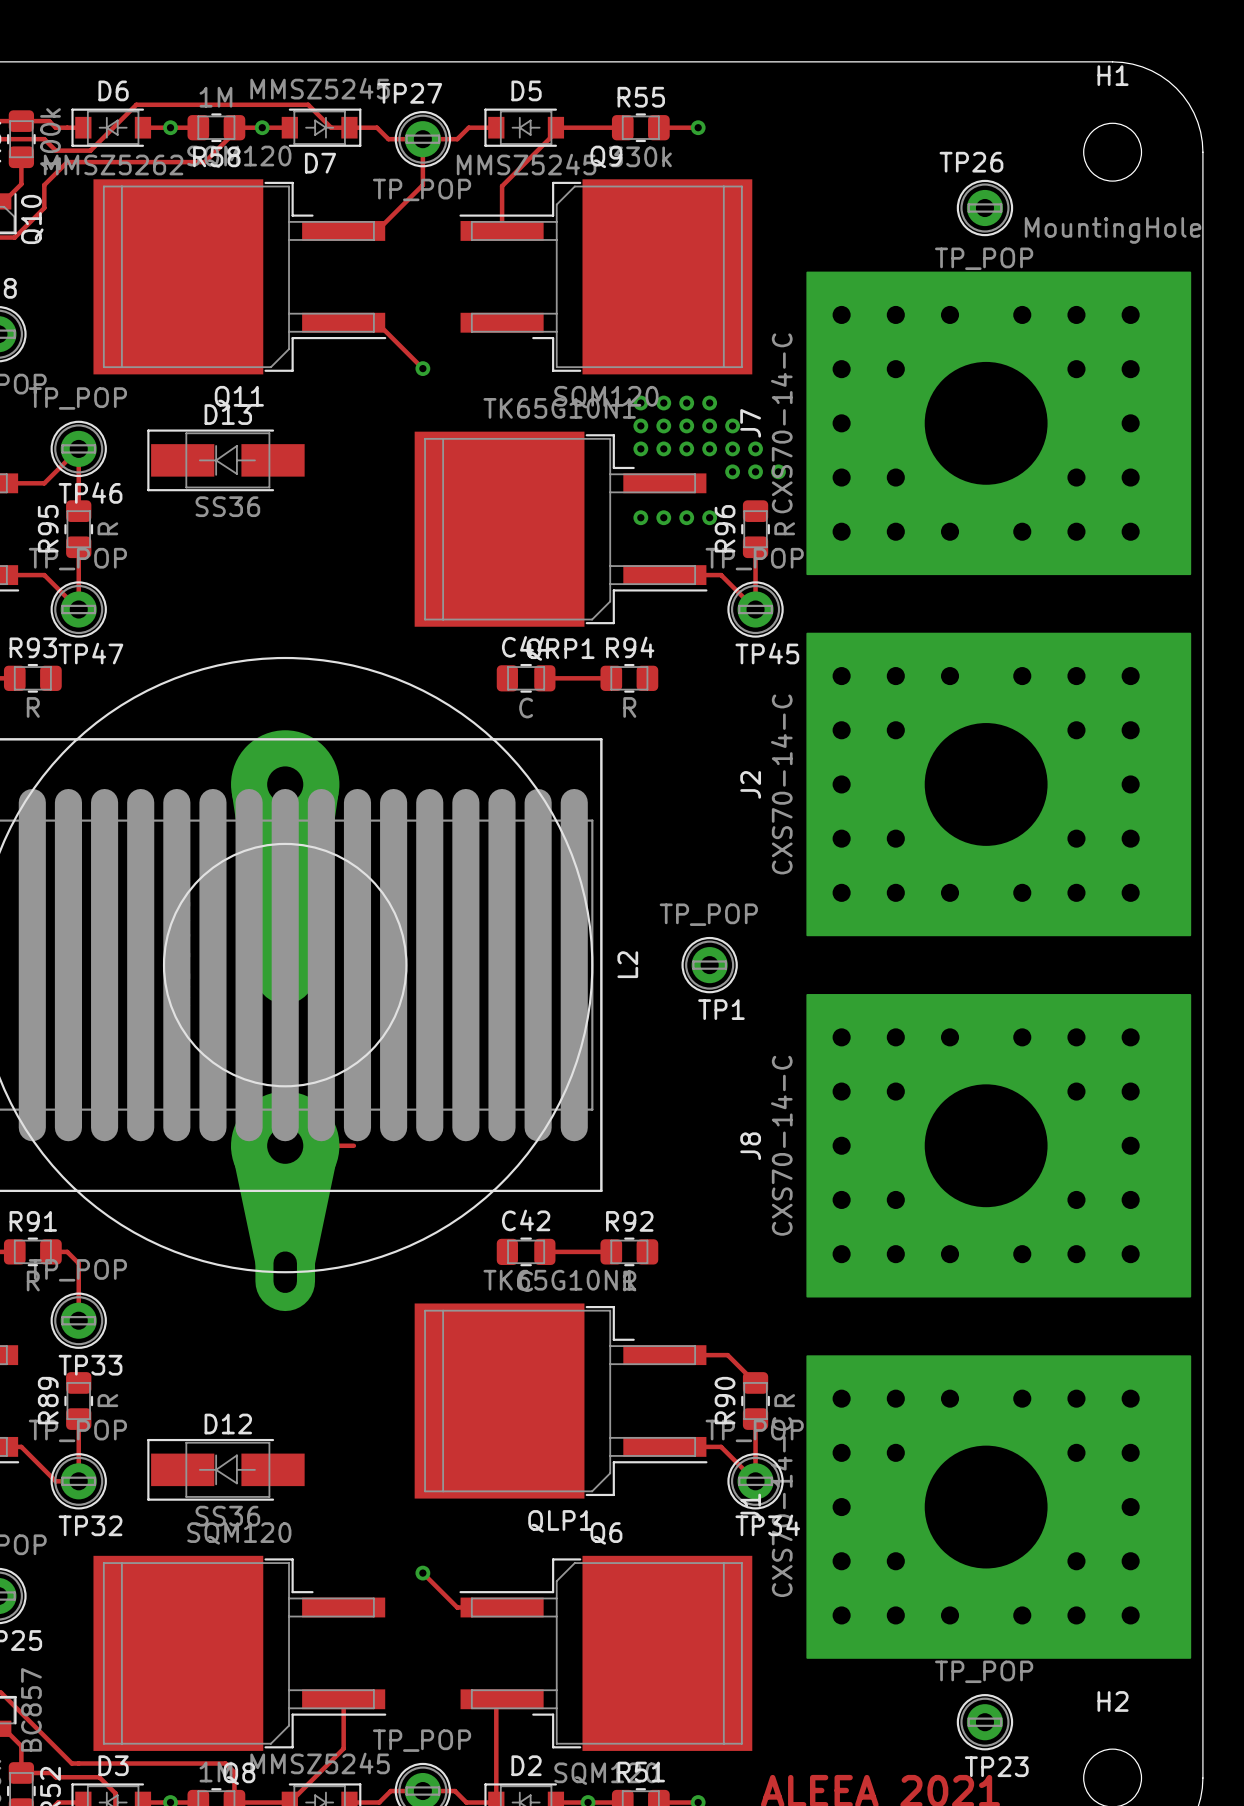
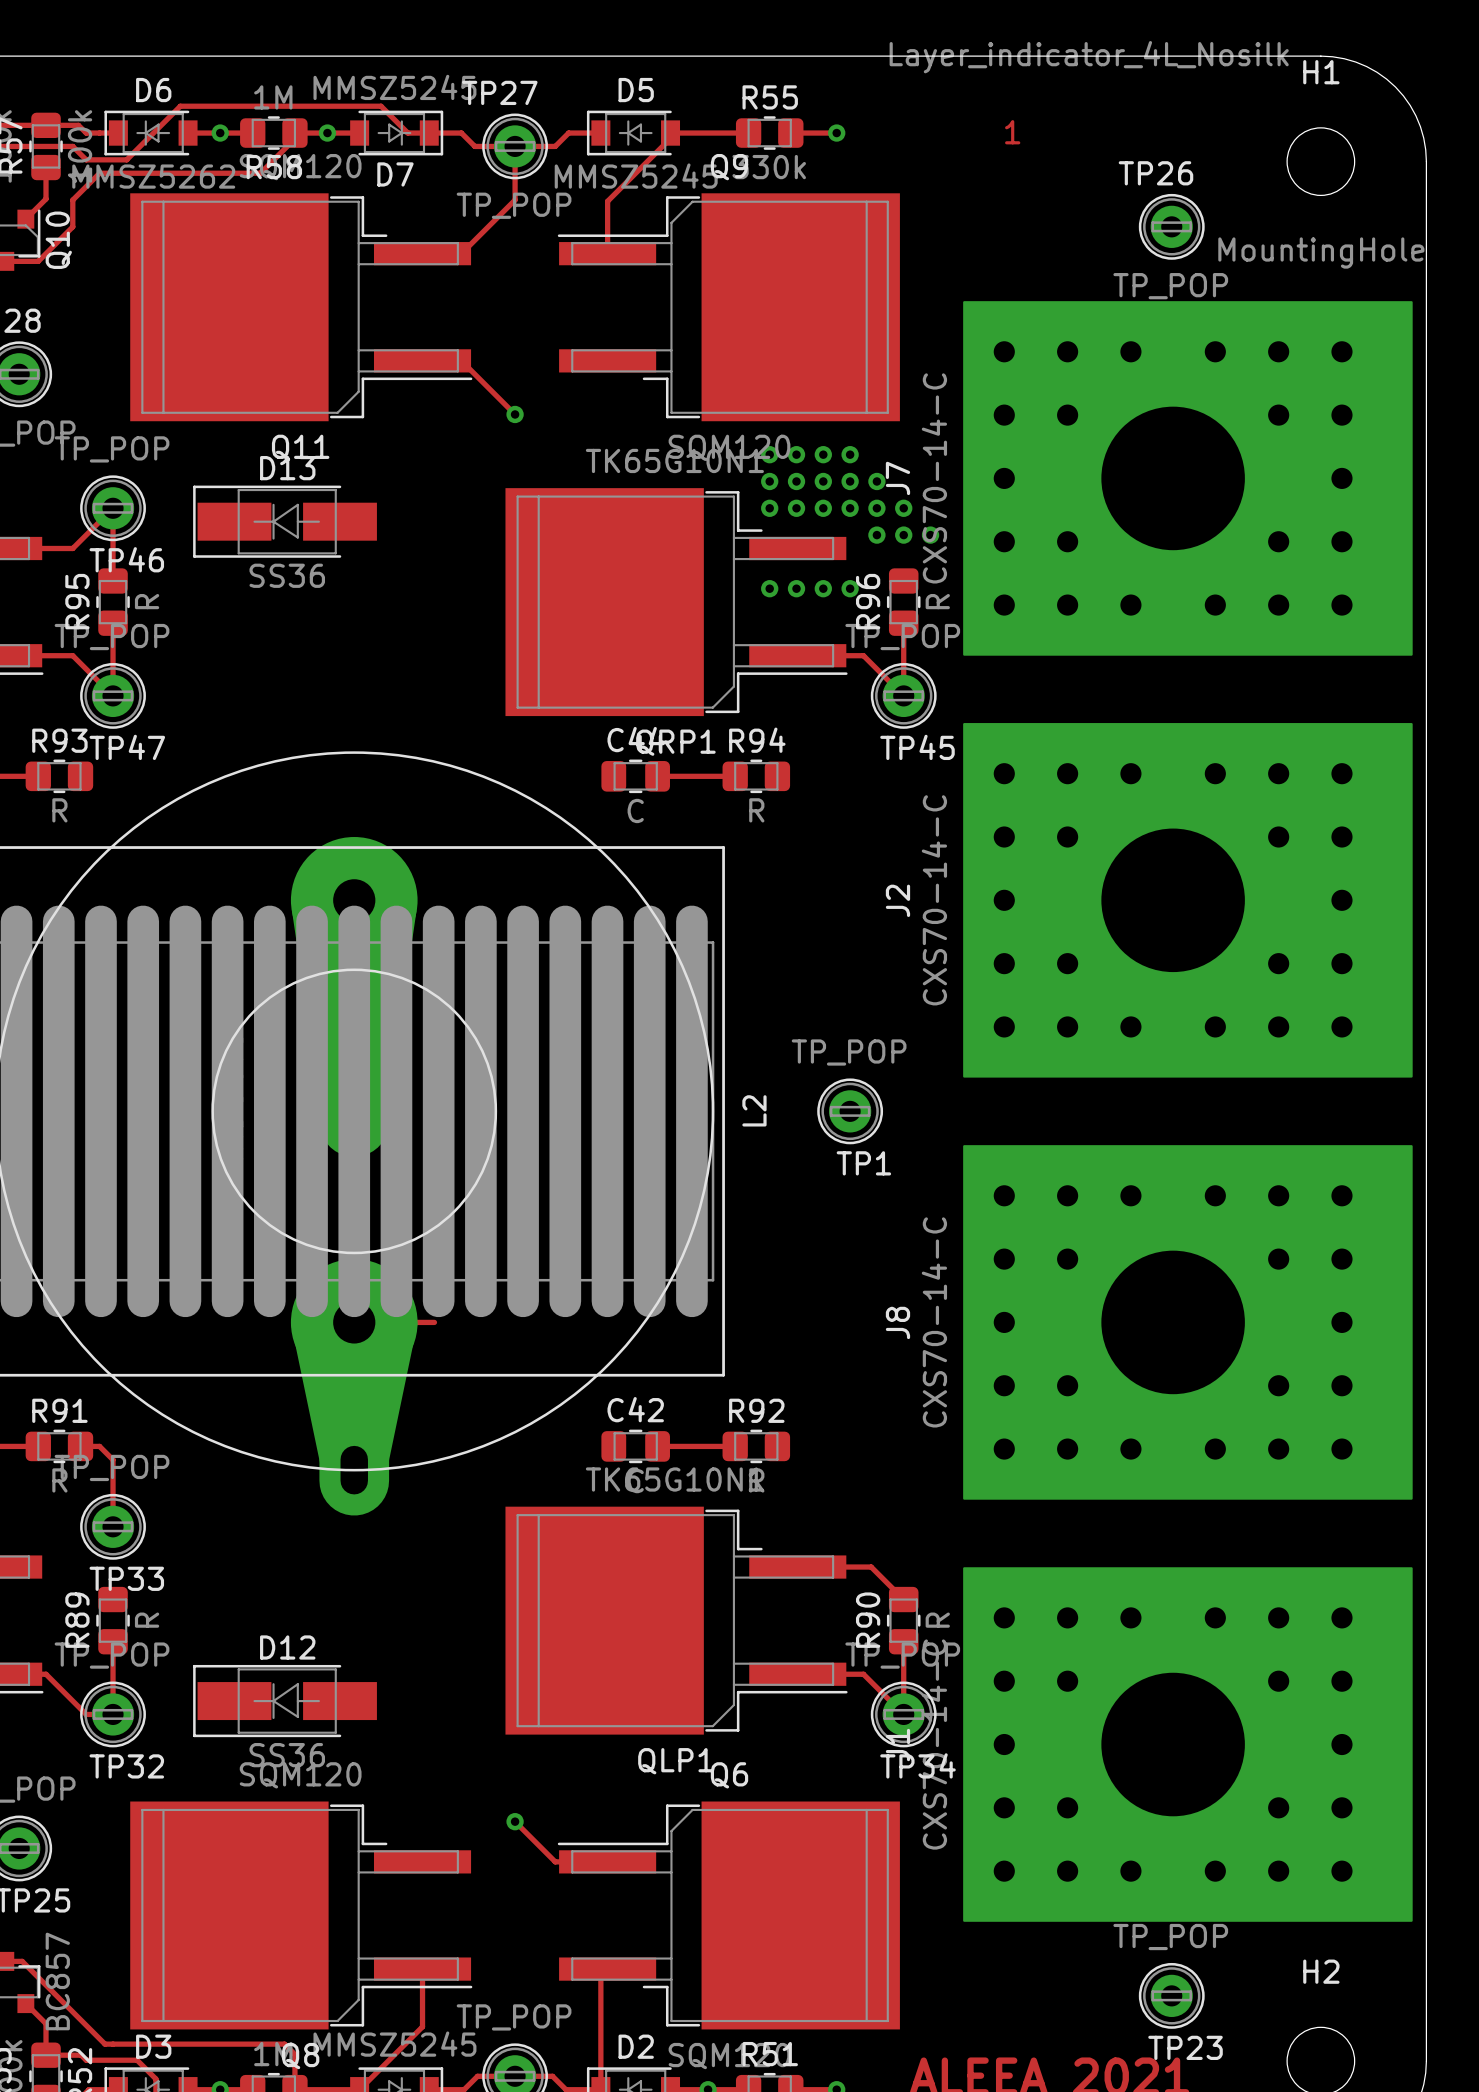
drawing: none -> [889, 41, 1289, 145]

